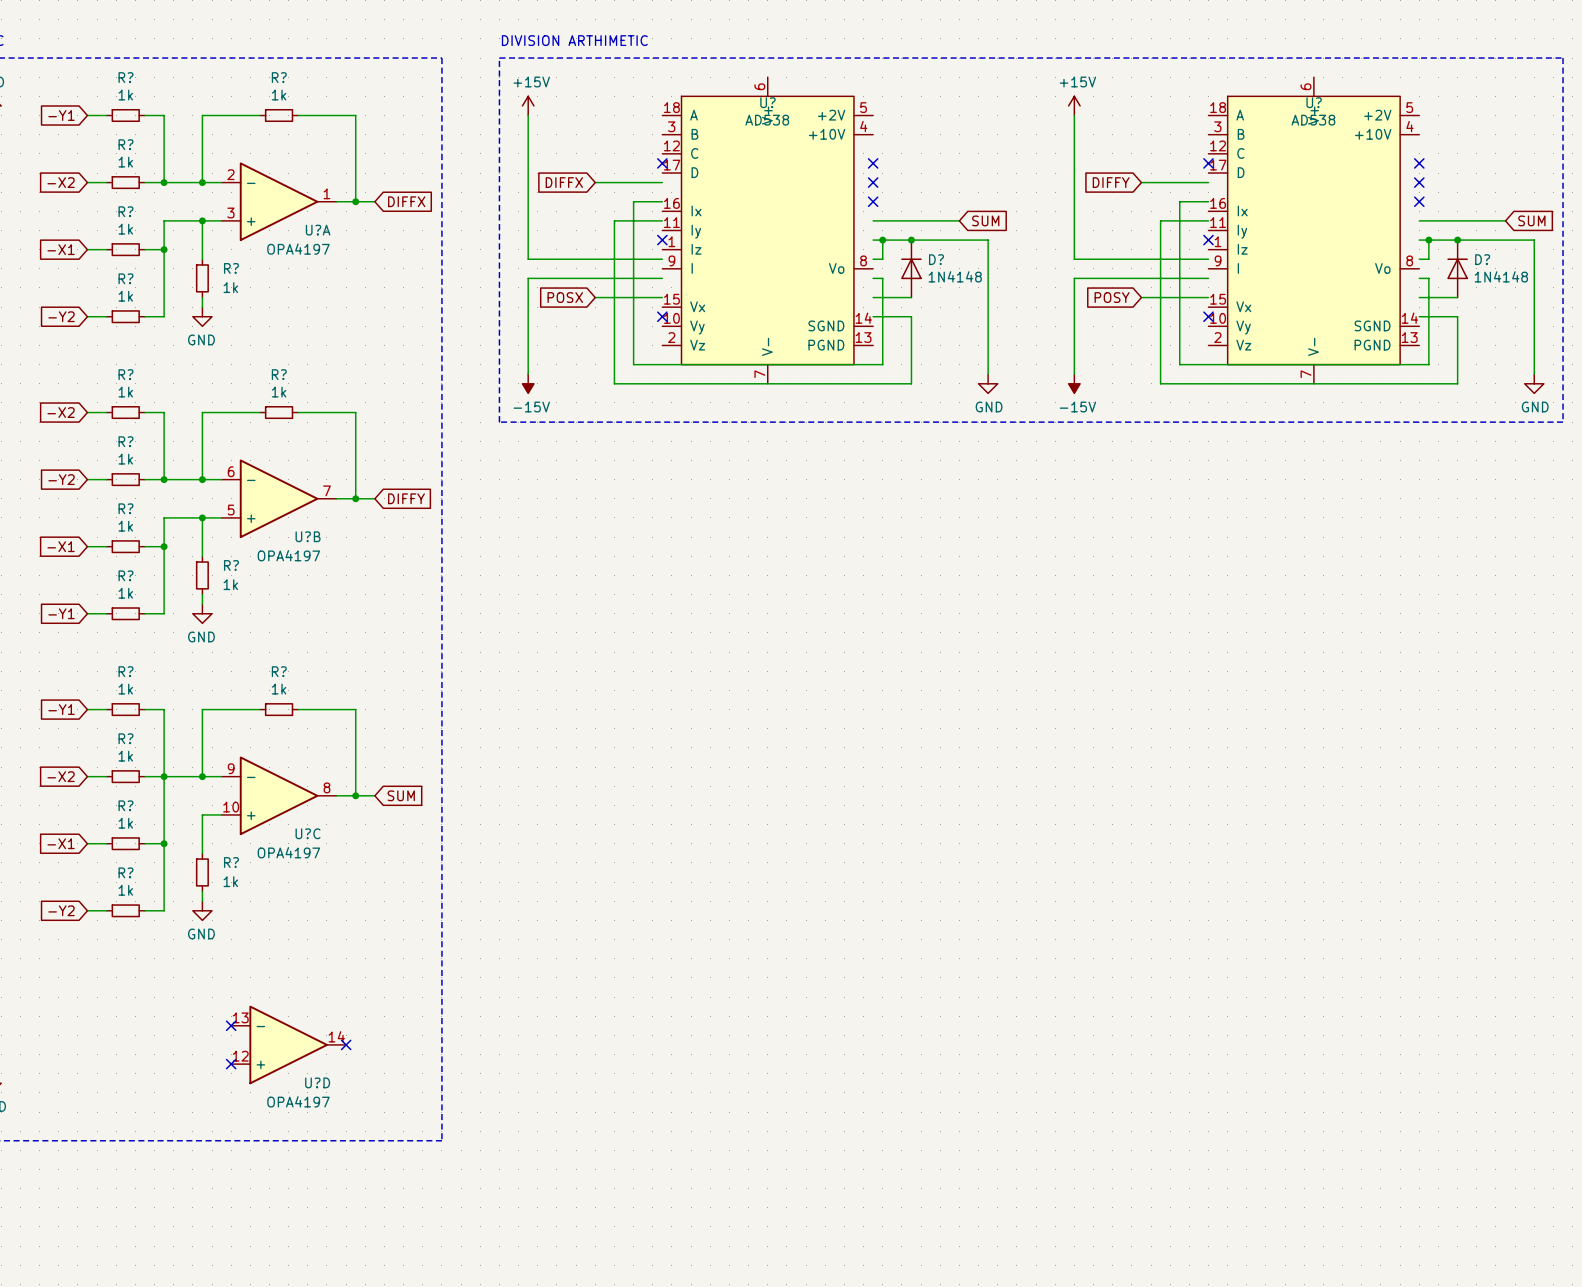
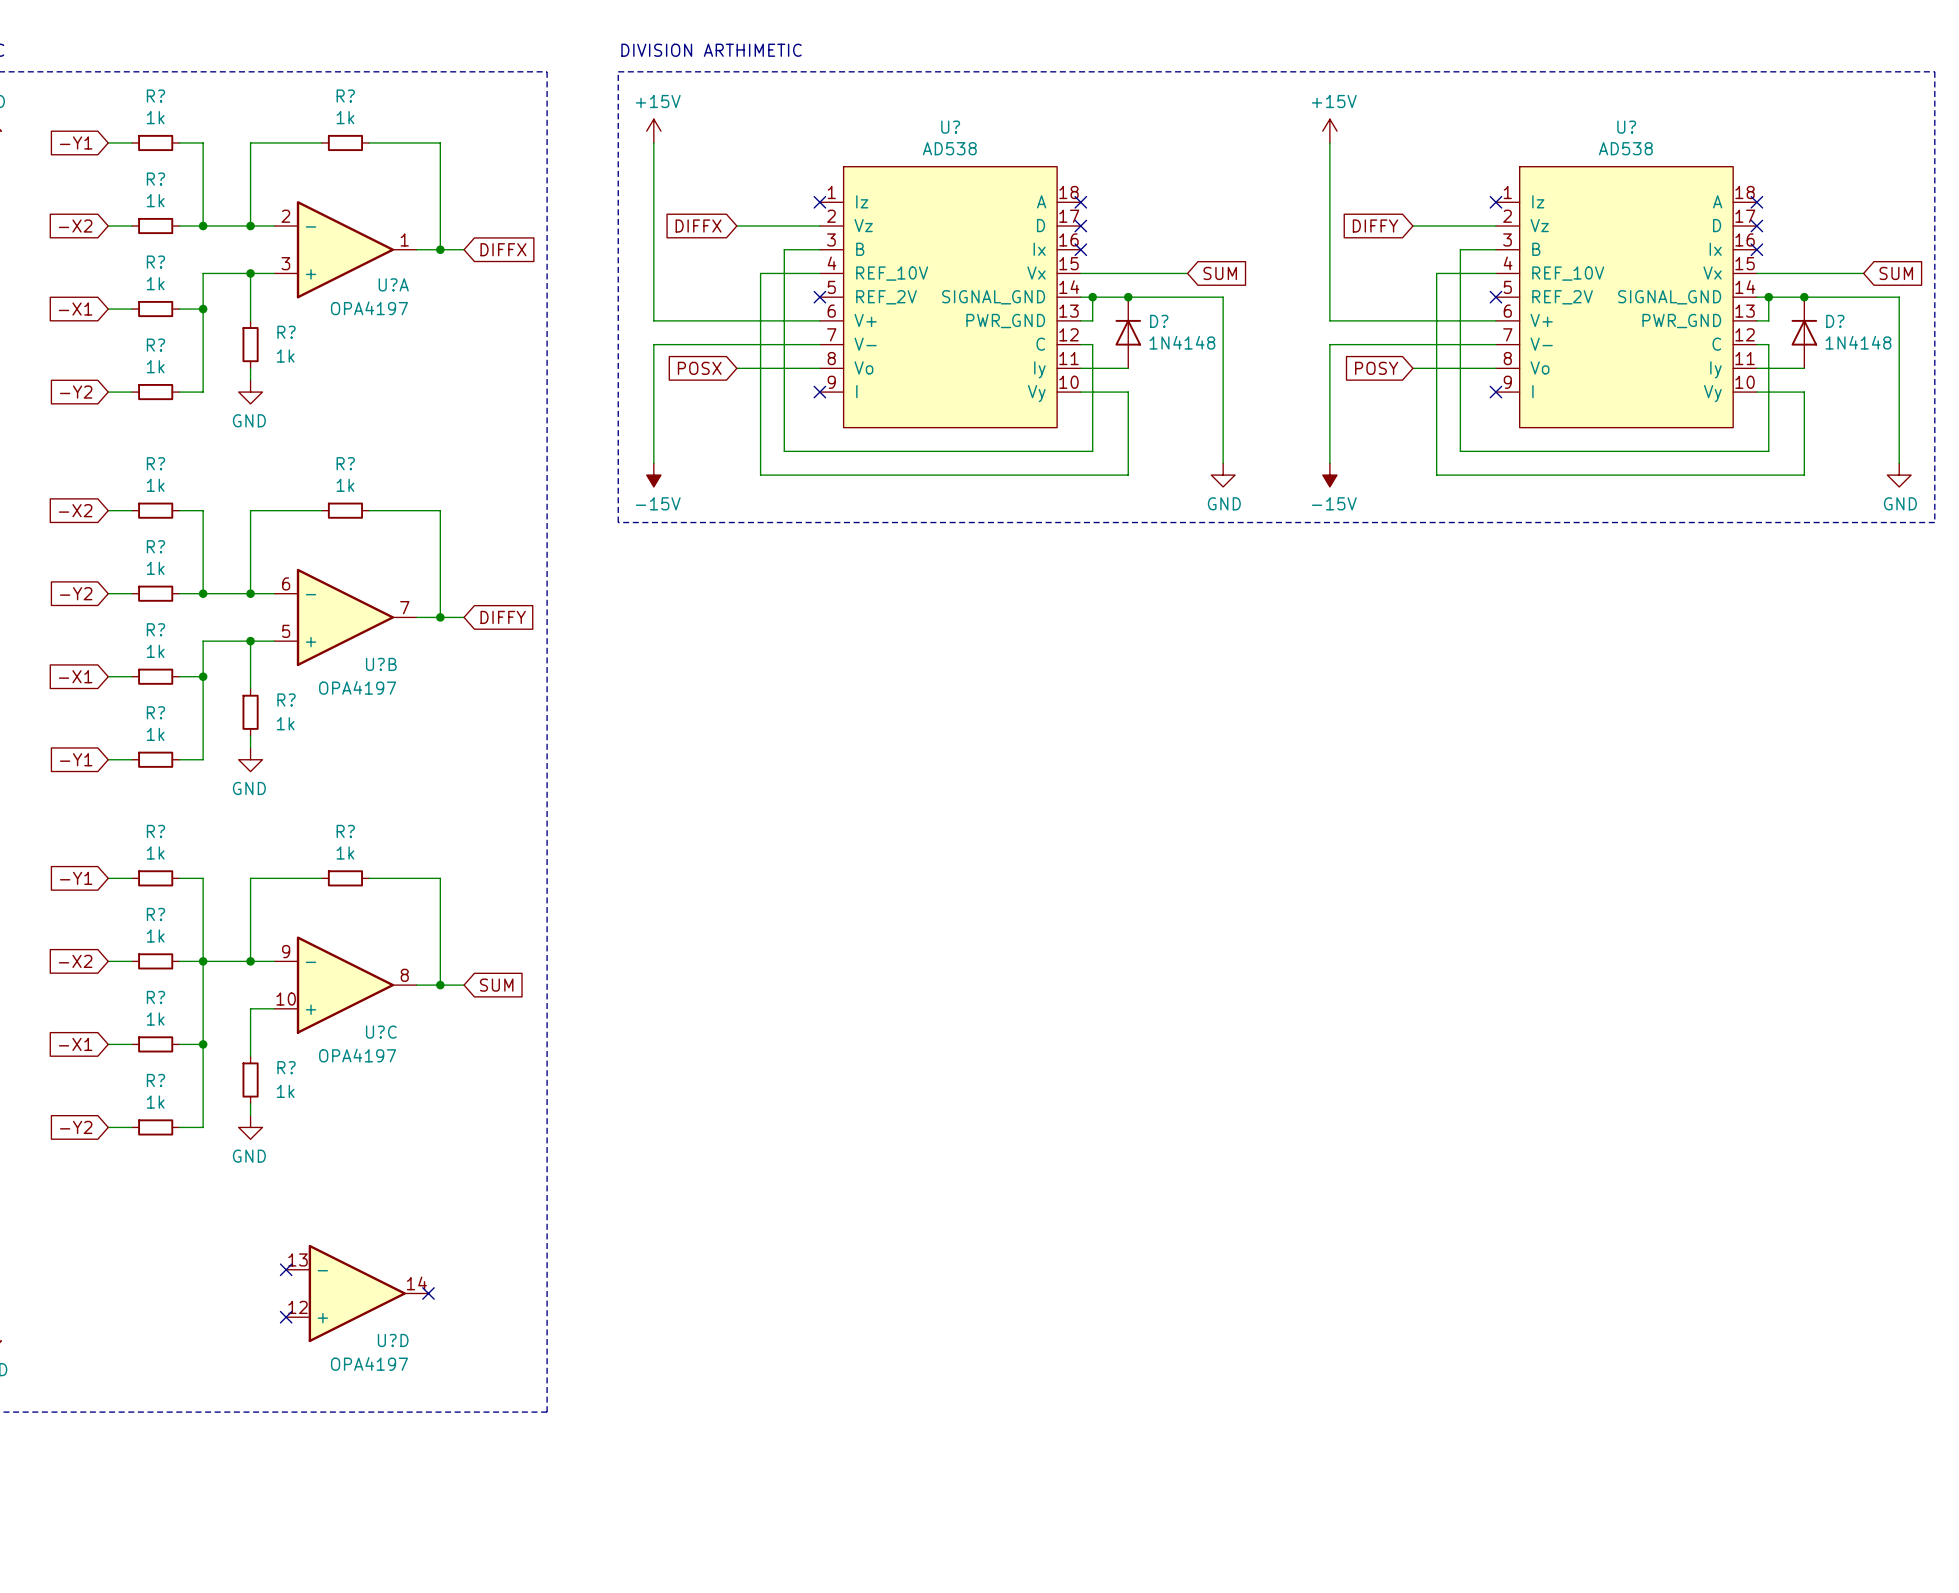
U?: AD538 (767, 230) -> none
U?: AD538 (1313, 230) -> none
U?: none -> AD538 (950, 297)
U?: none -> AD538 (1626, 297)

